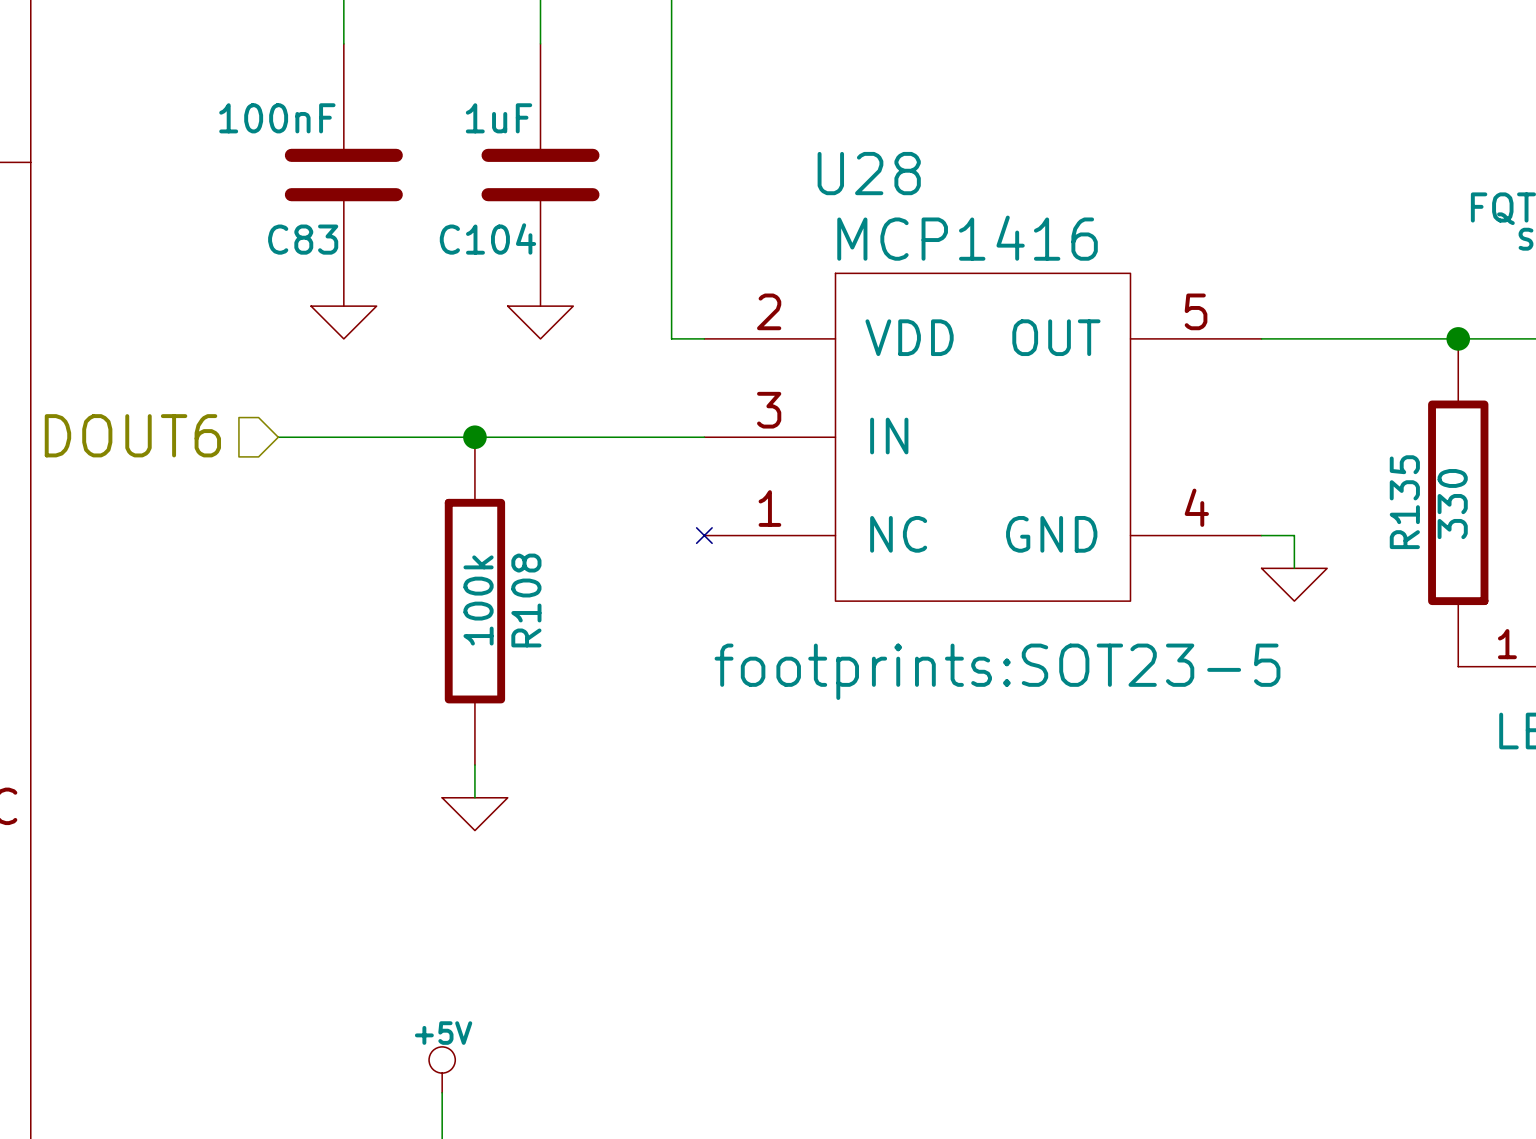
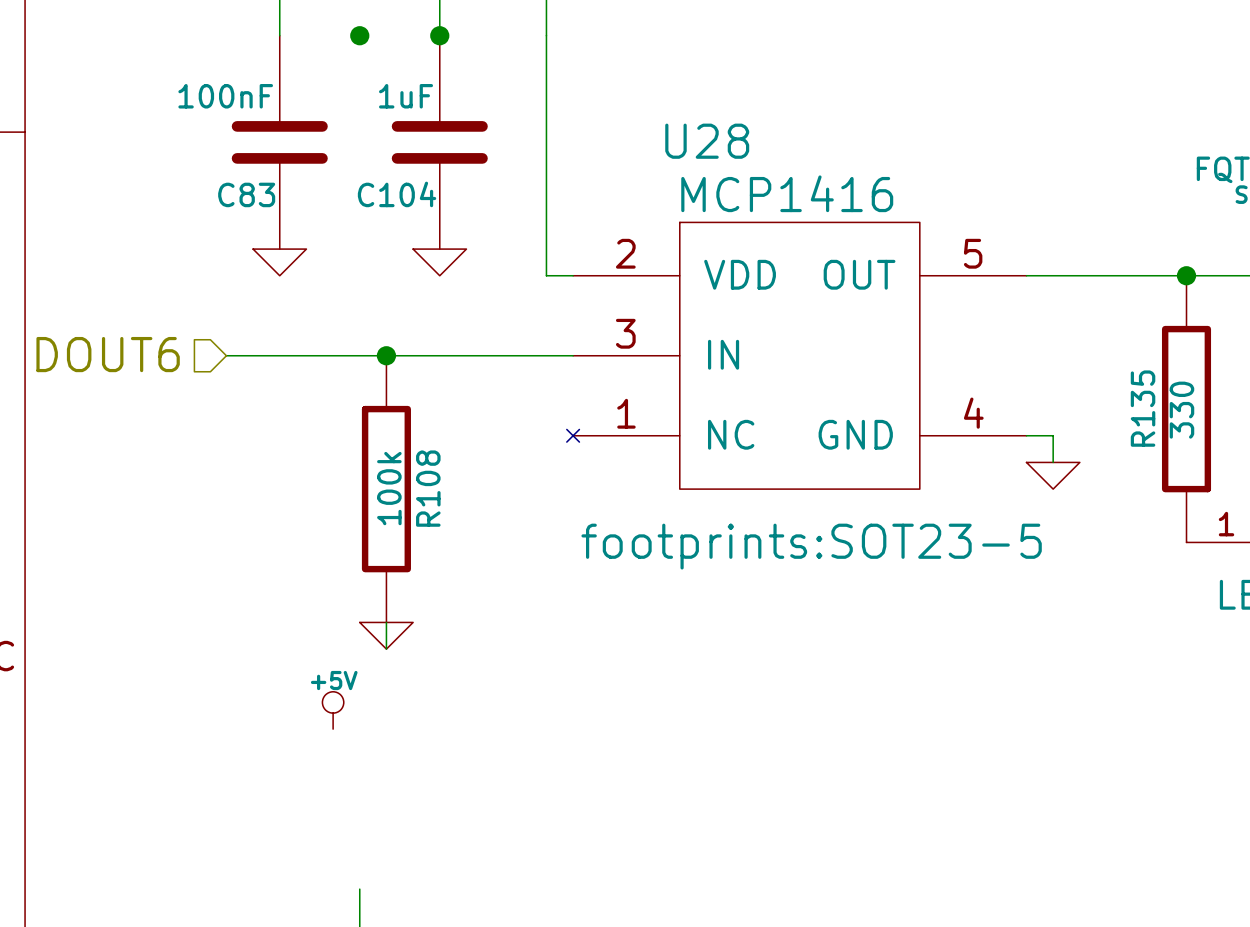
junction: none -> (359, 35)
junction: none -> (439, 35)
power symbol position: (474, 814) -> (386, 635)
power symbol position: +5V (442, 1069) -> +5V (333, 710)

